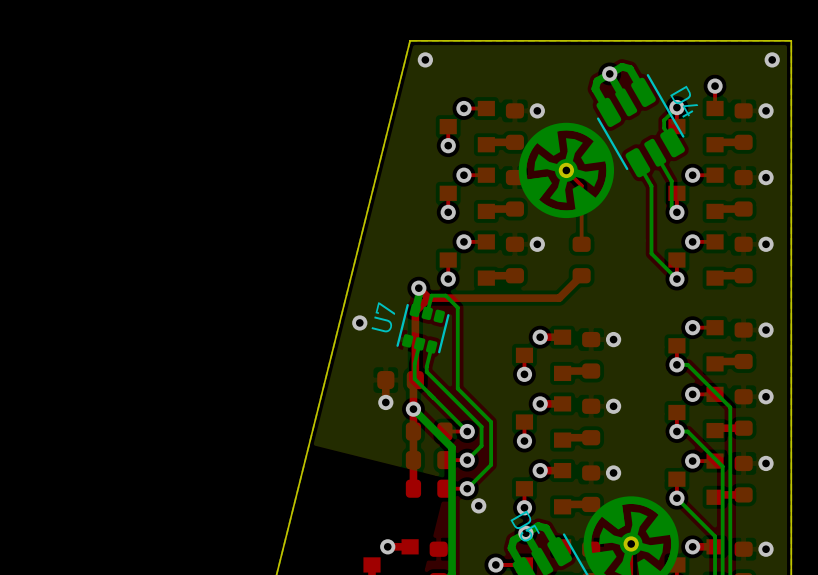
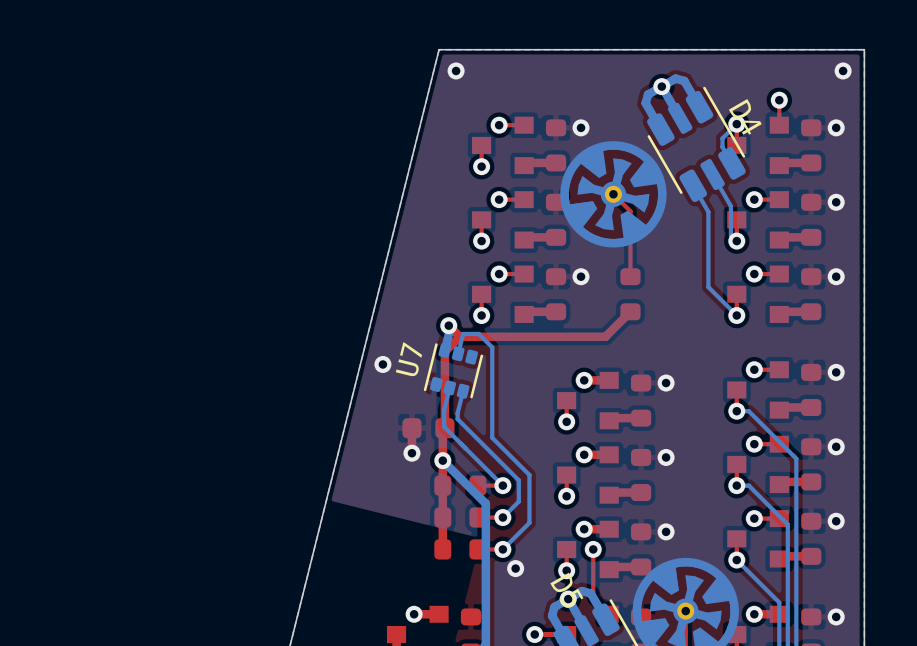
top track: none -> (593, 549) (593, 598) (609, 614)
via: none -> (593, 549)

